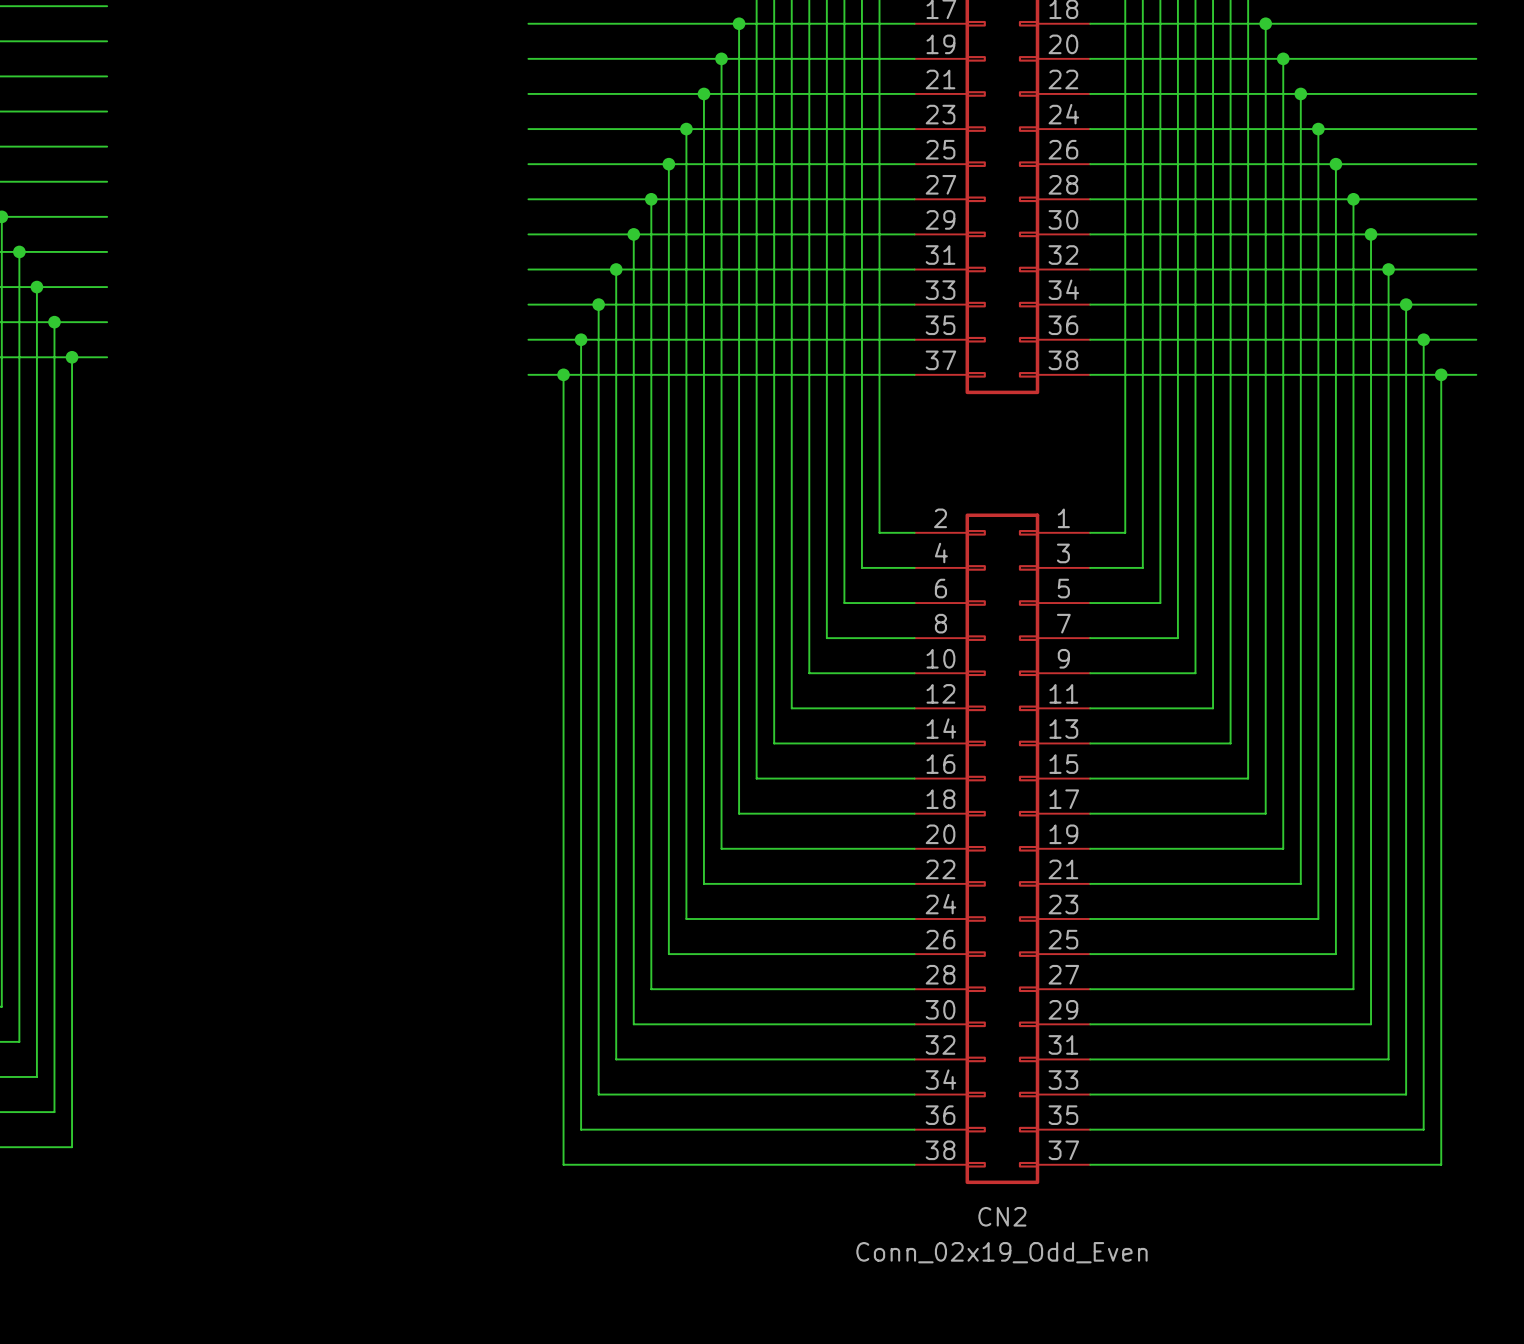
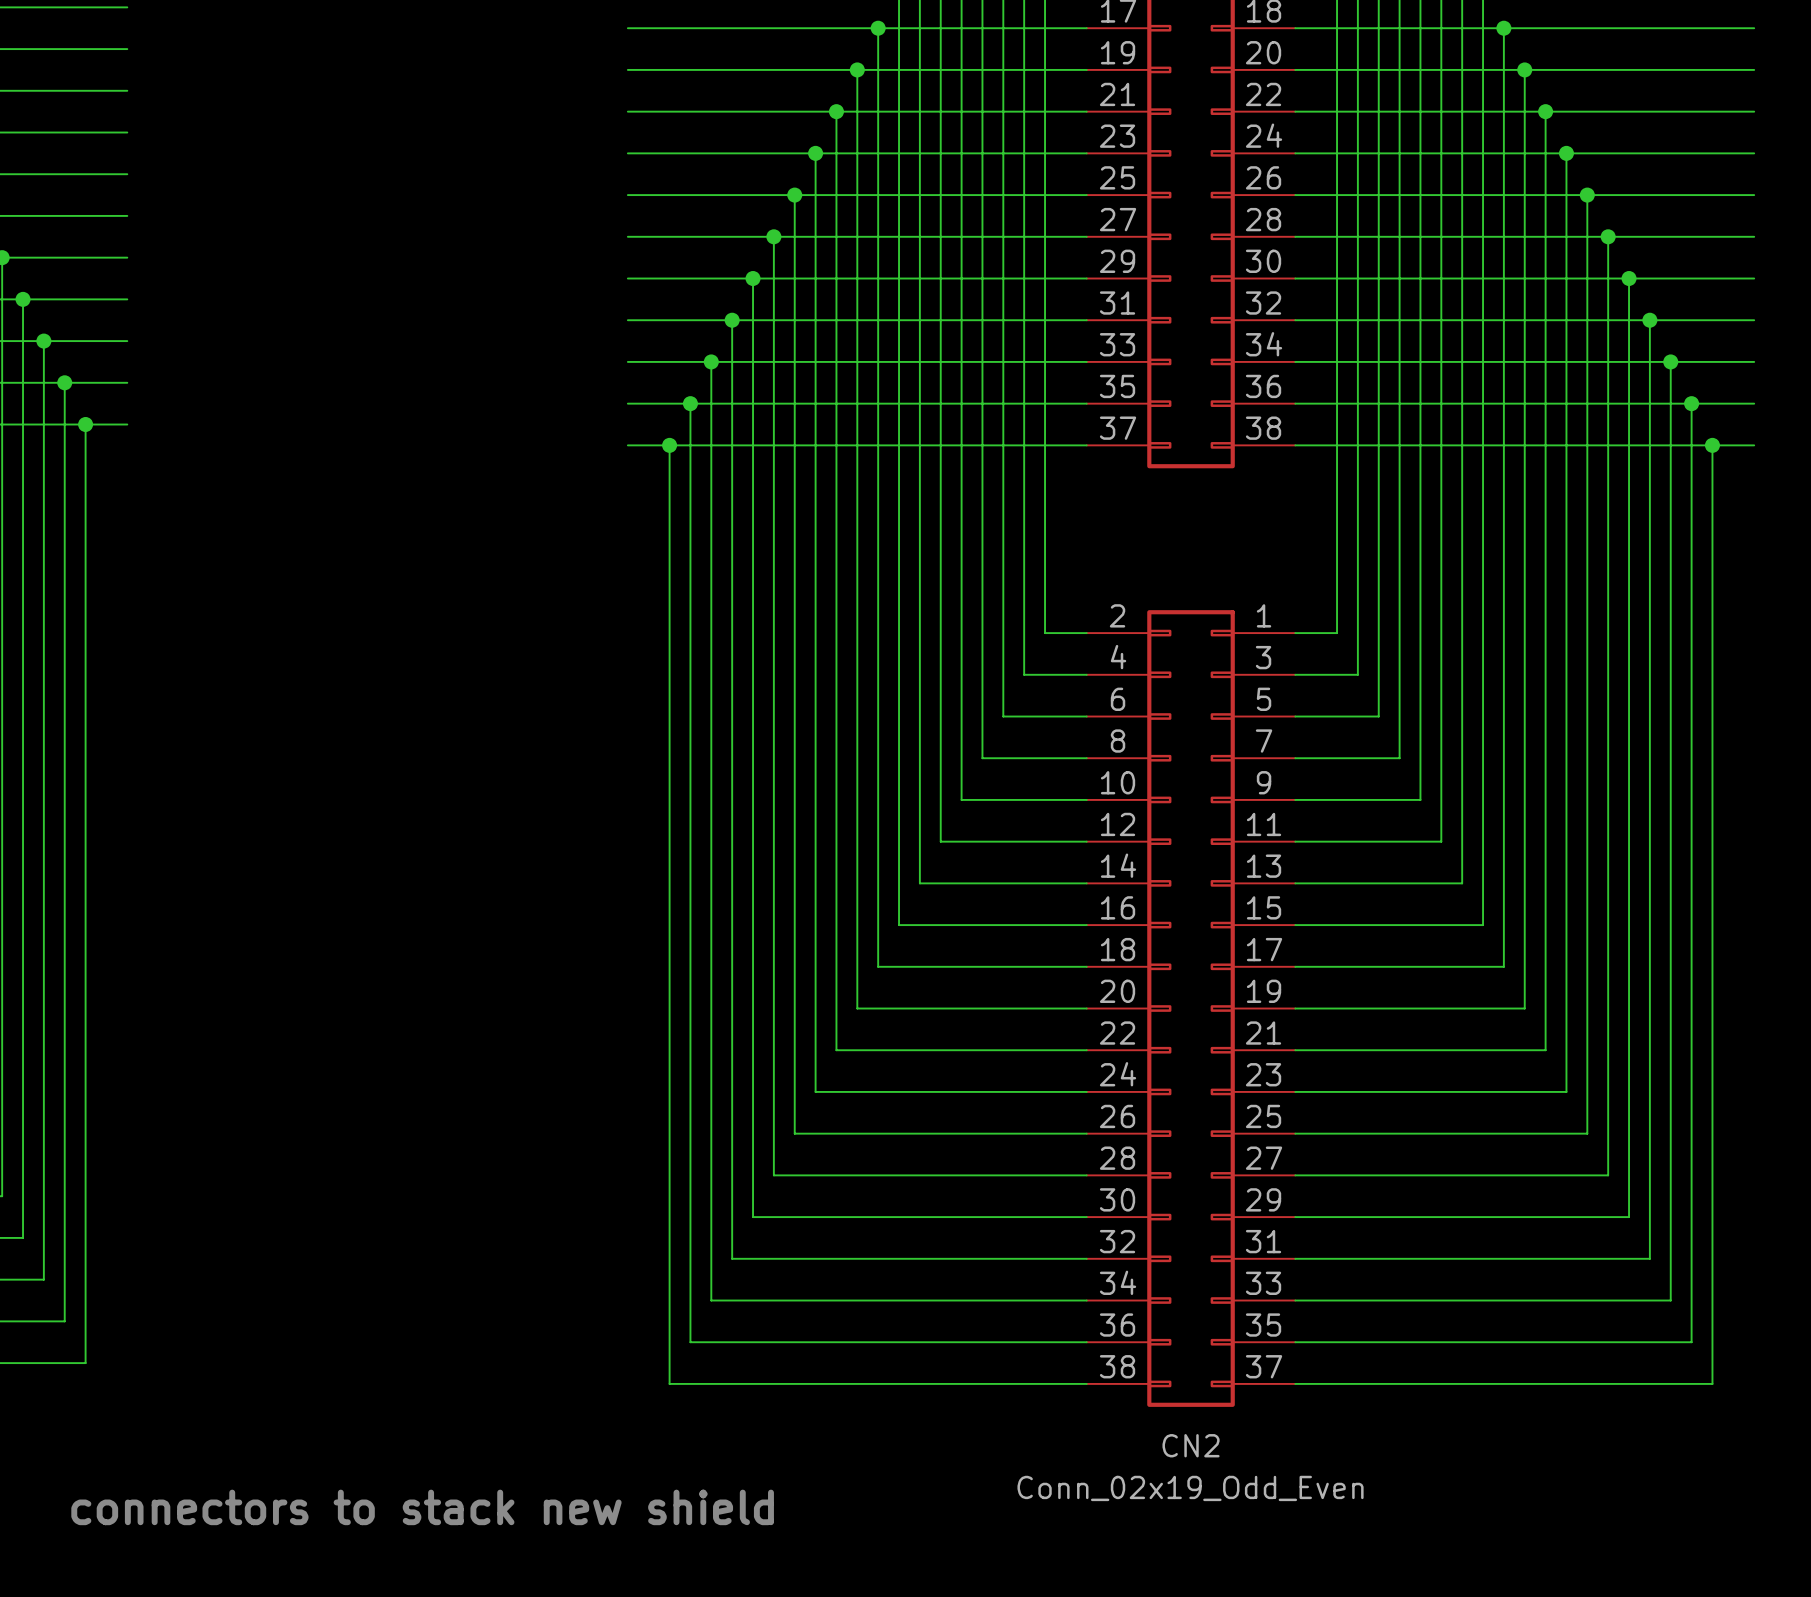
text: none -> connectors to stack new shield (422, 1507)

